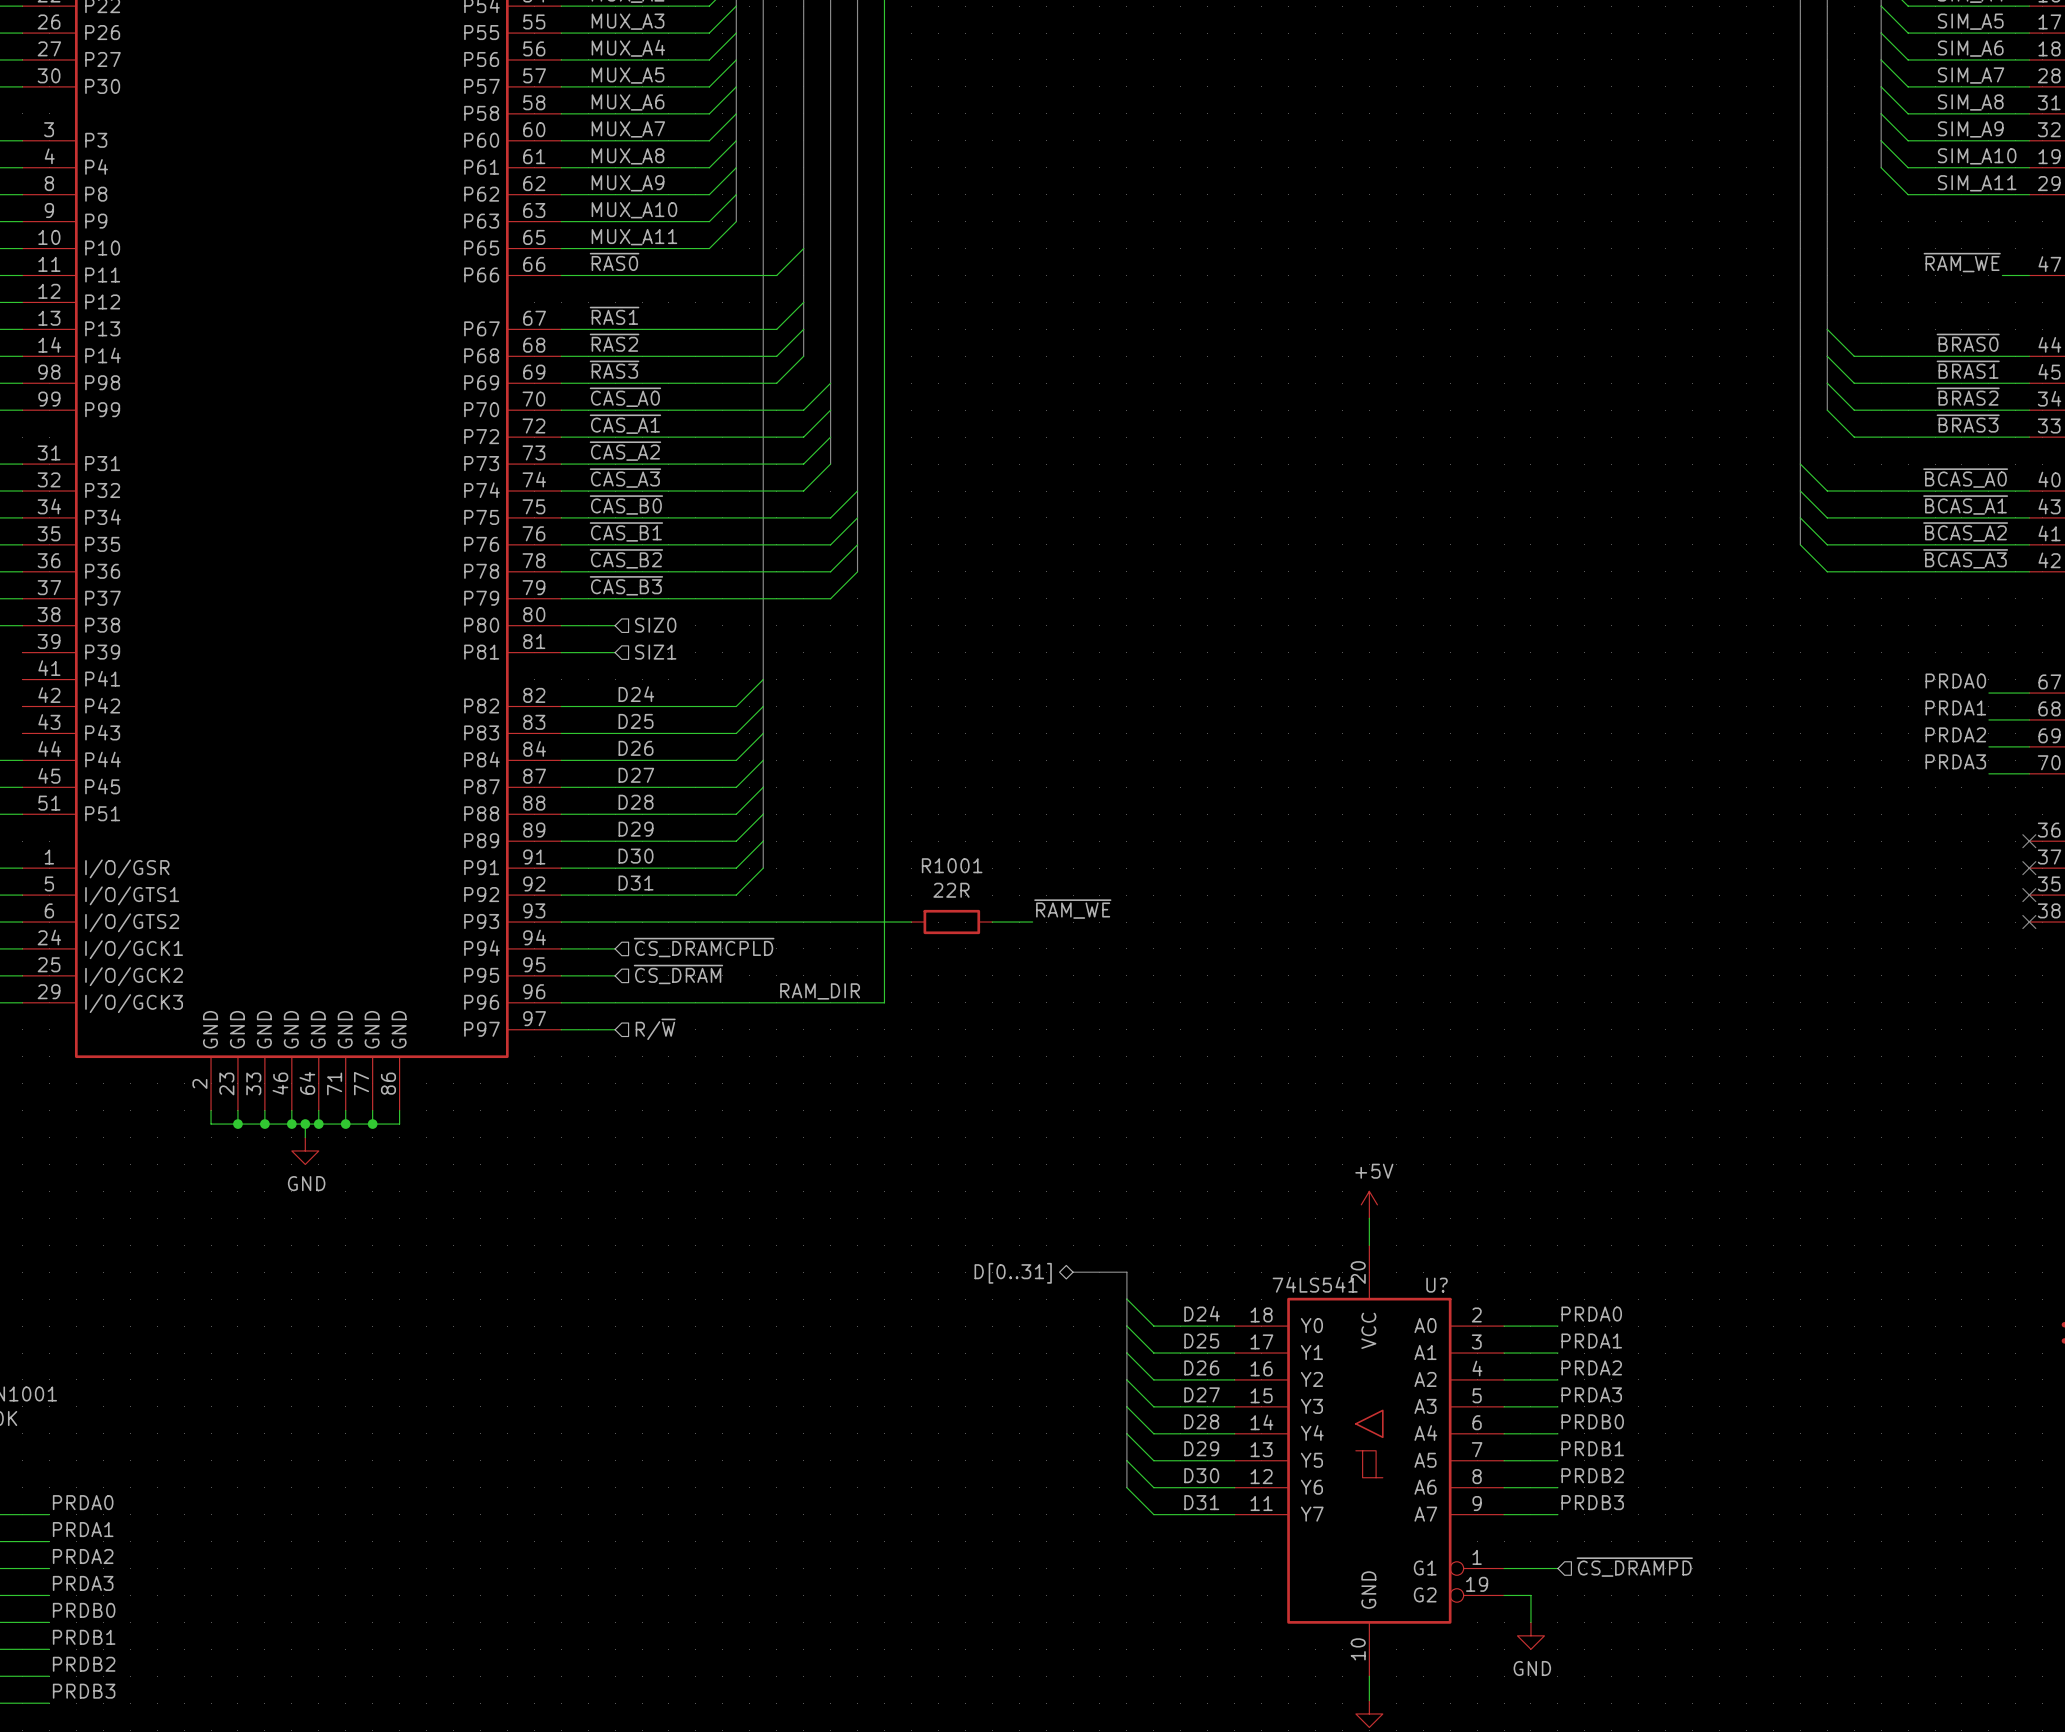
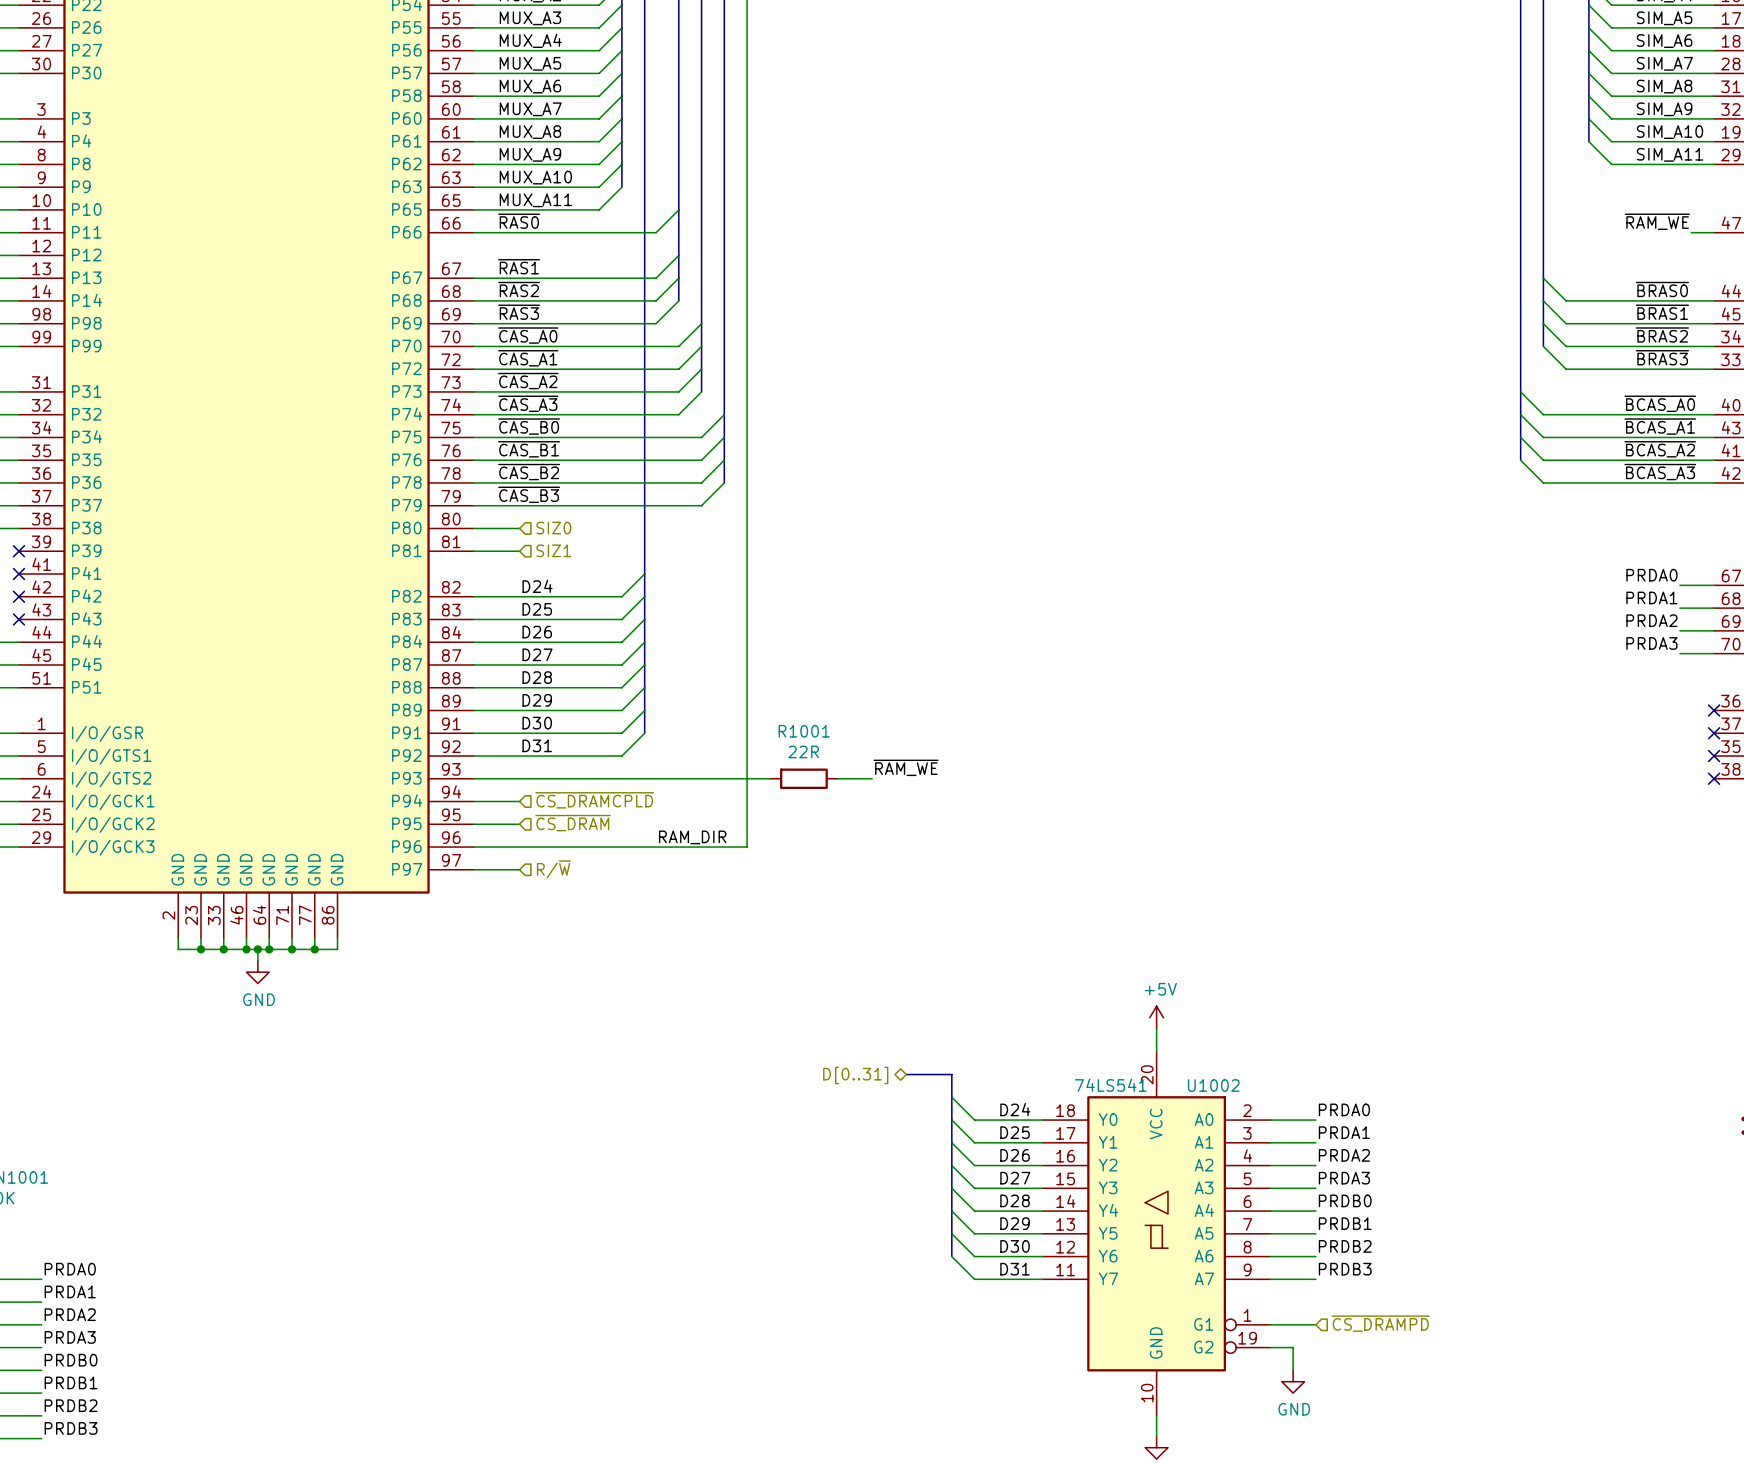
no-connect mark: none -> (18, 551)
no-connect mark: none -> (18, 573)
no-connect mark: none -> (18, 596)
no-connect mark: none -> (18, 619)
U? name: U? (1437, 1285) -> U1002 (1213, 1085)

